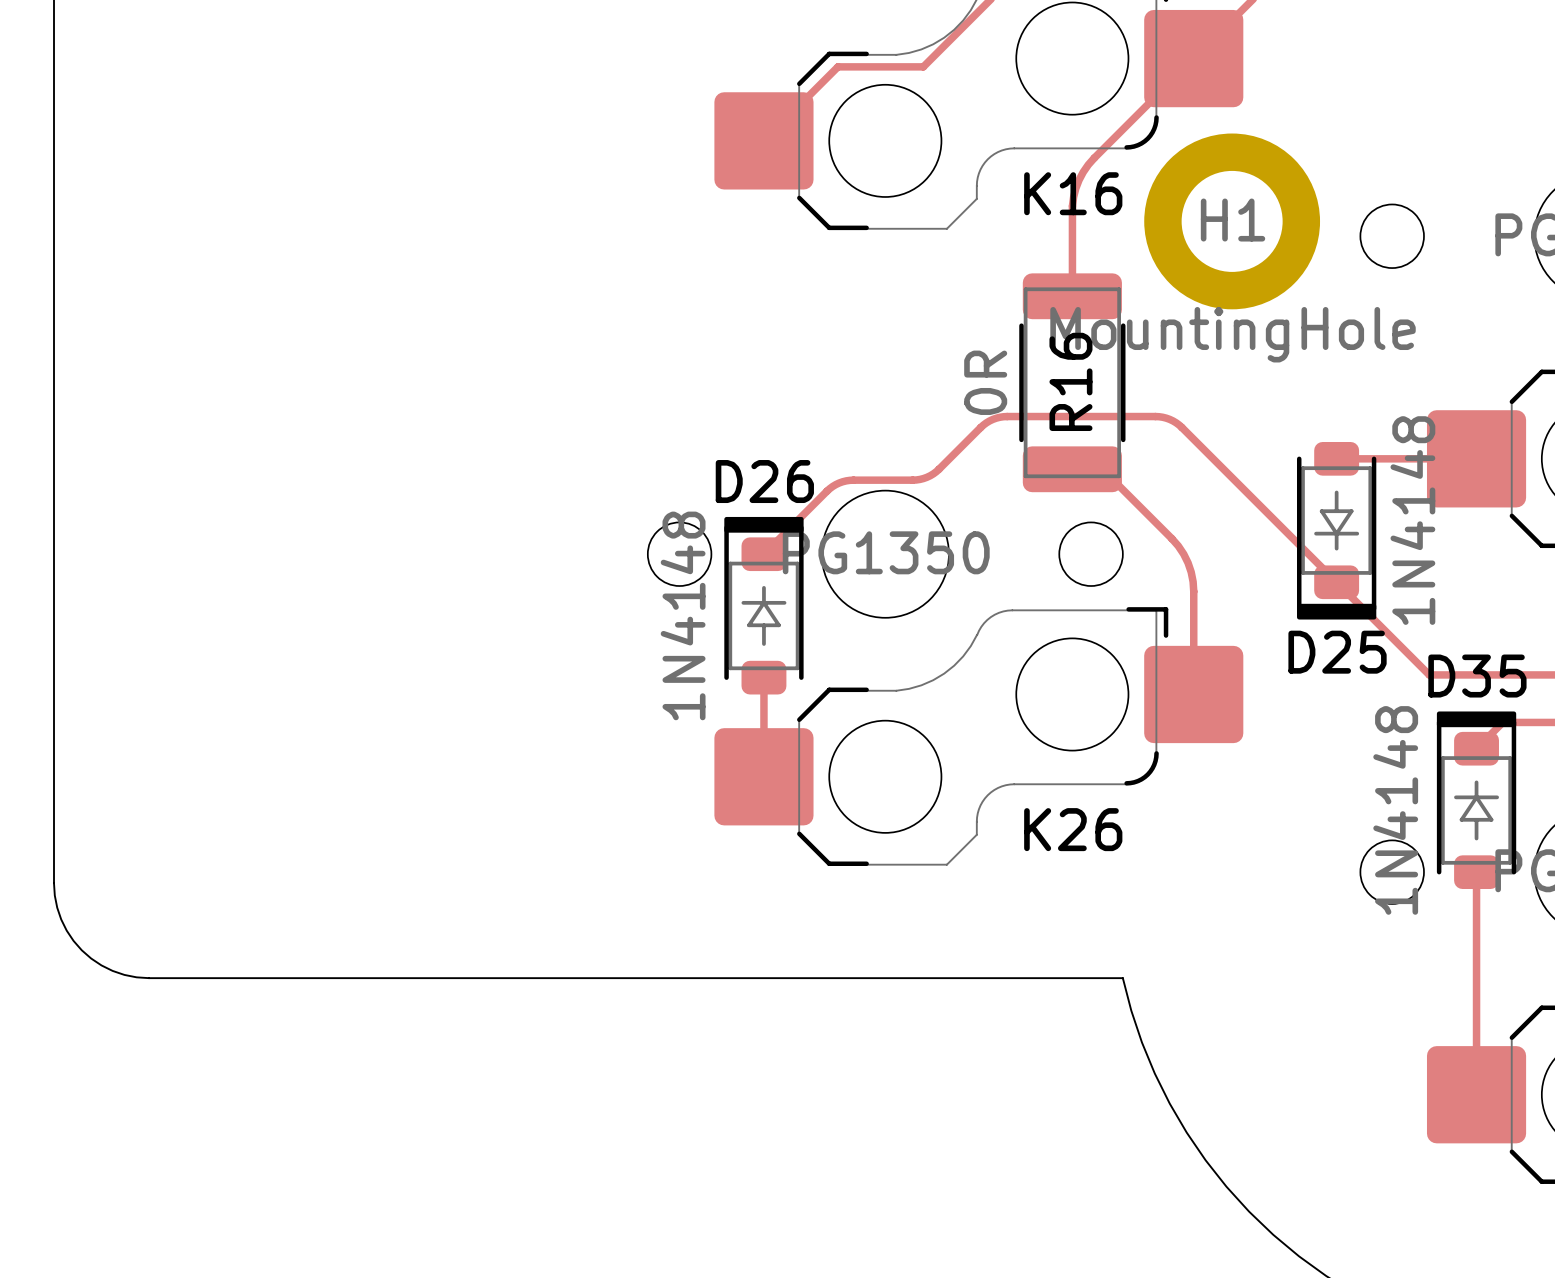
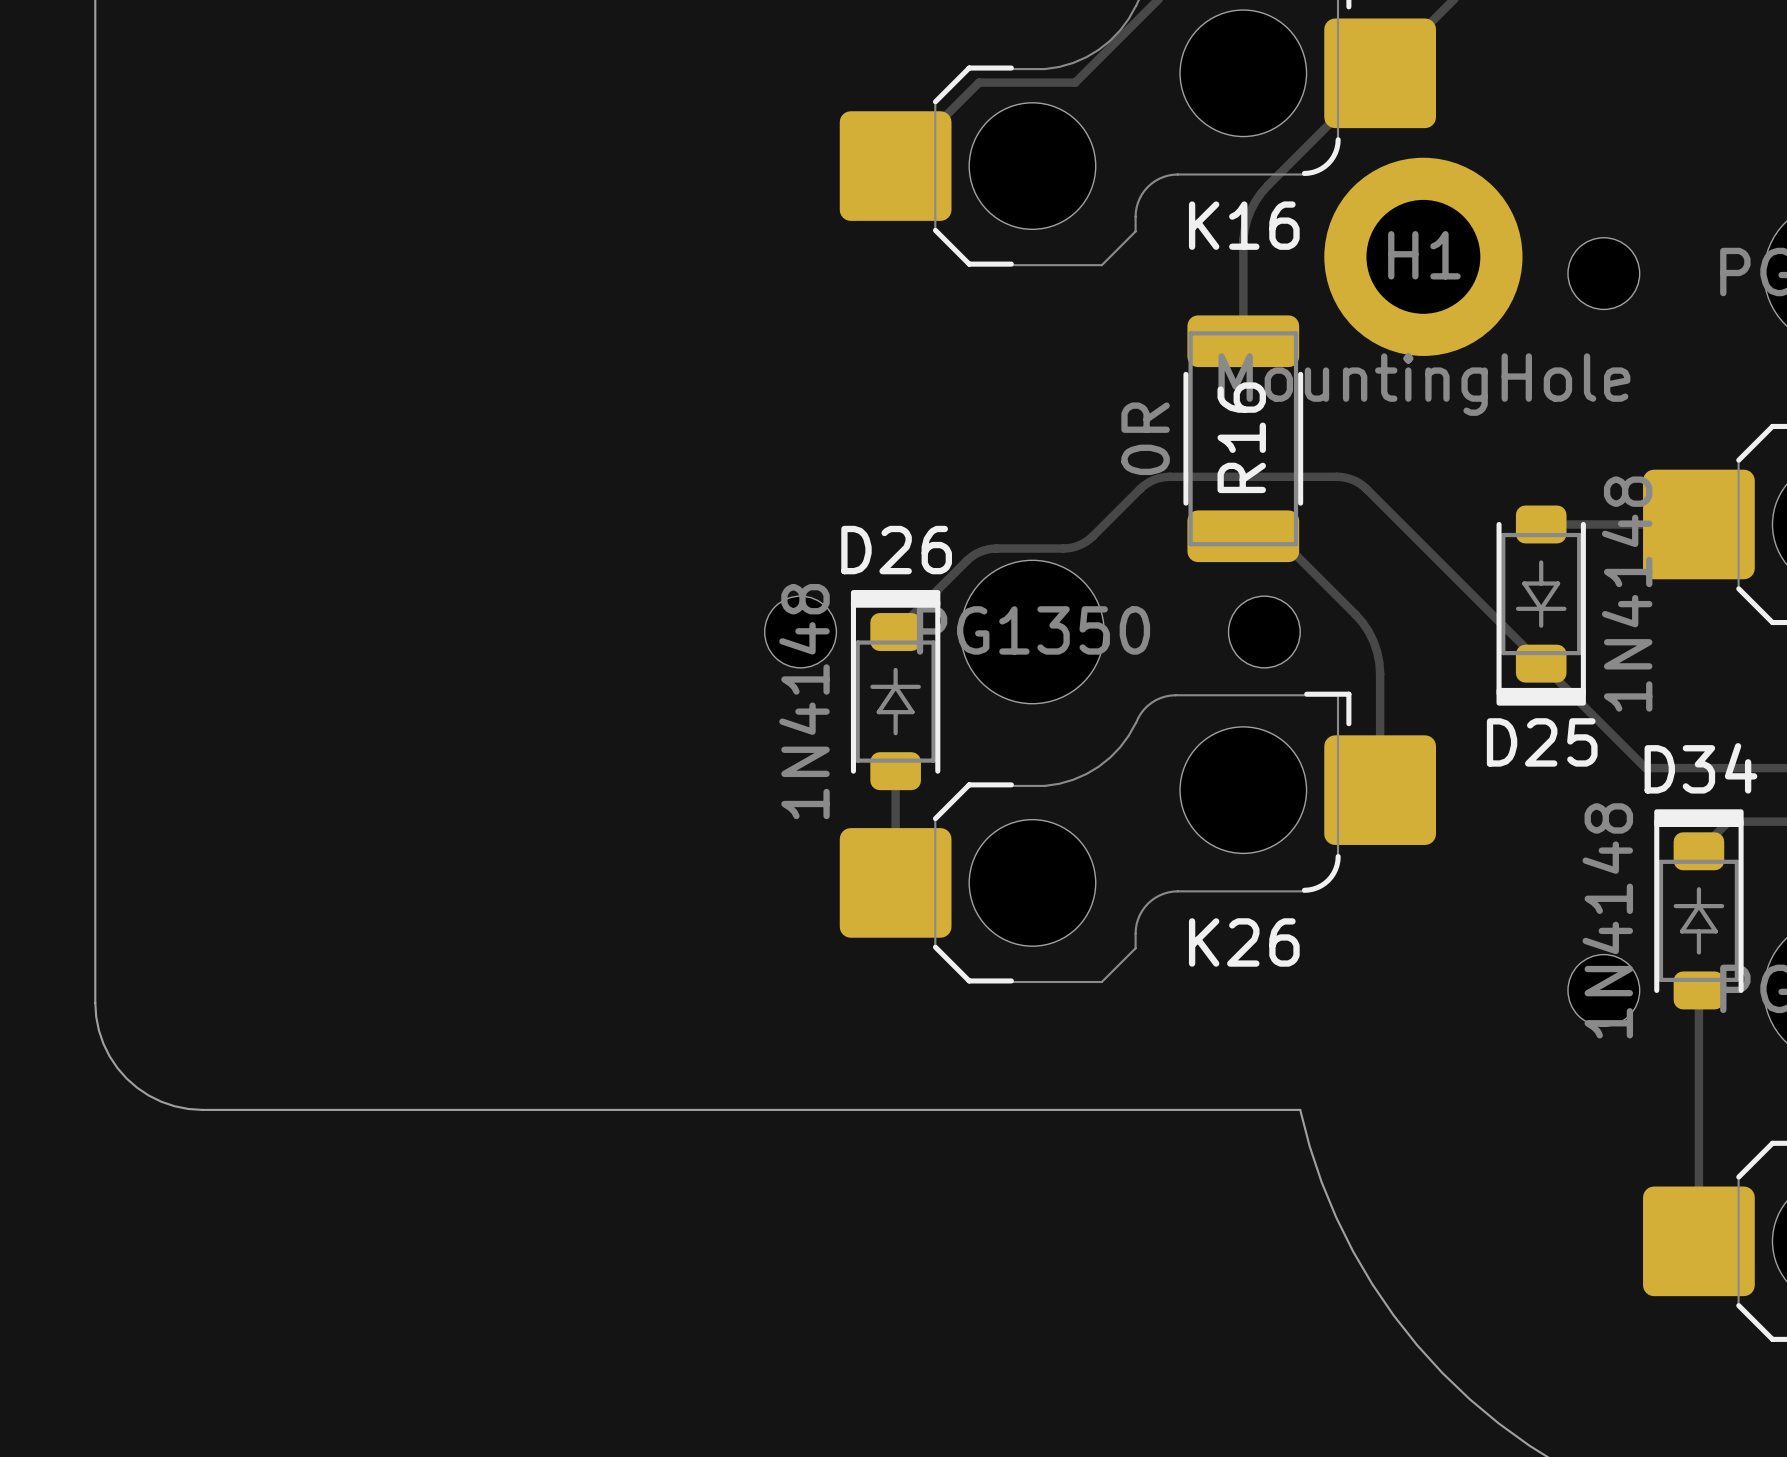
D35 name: D35 (1477, 676) -> D34 (1700, 768)

